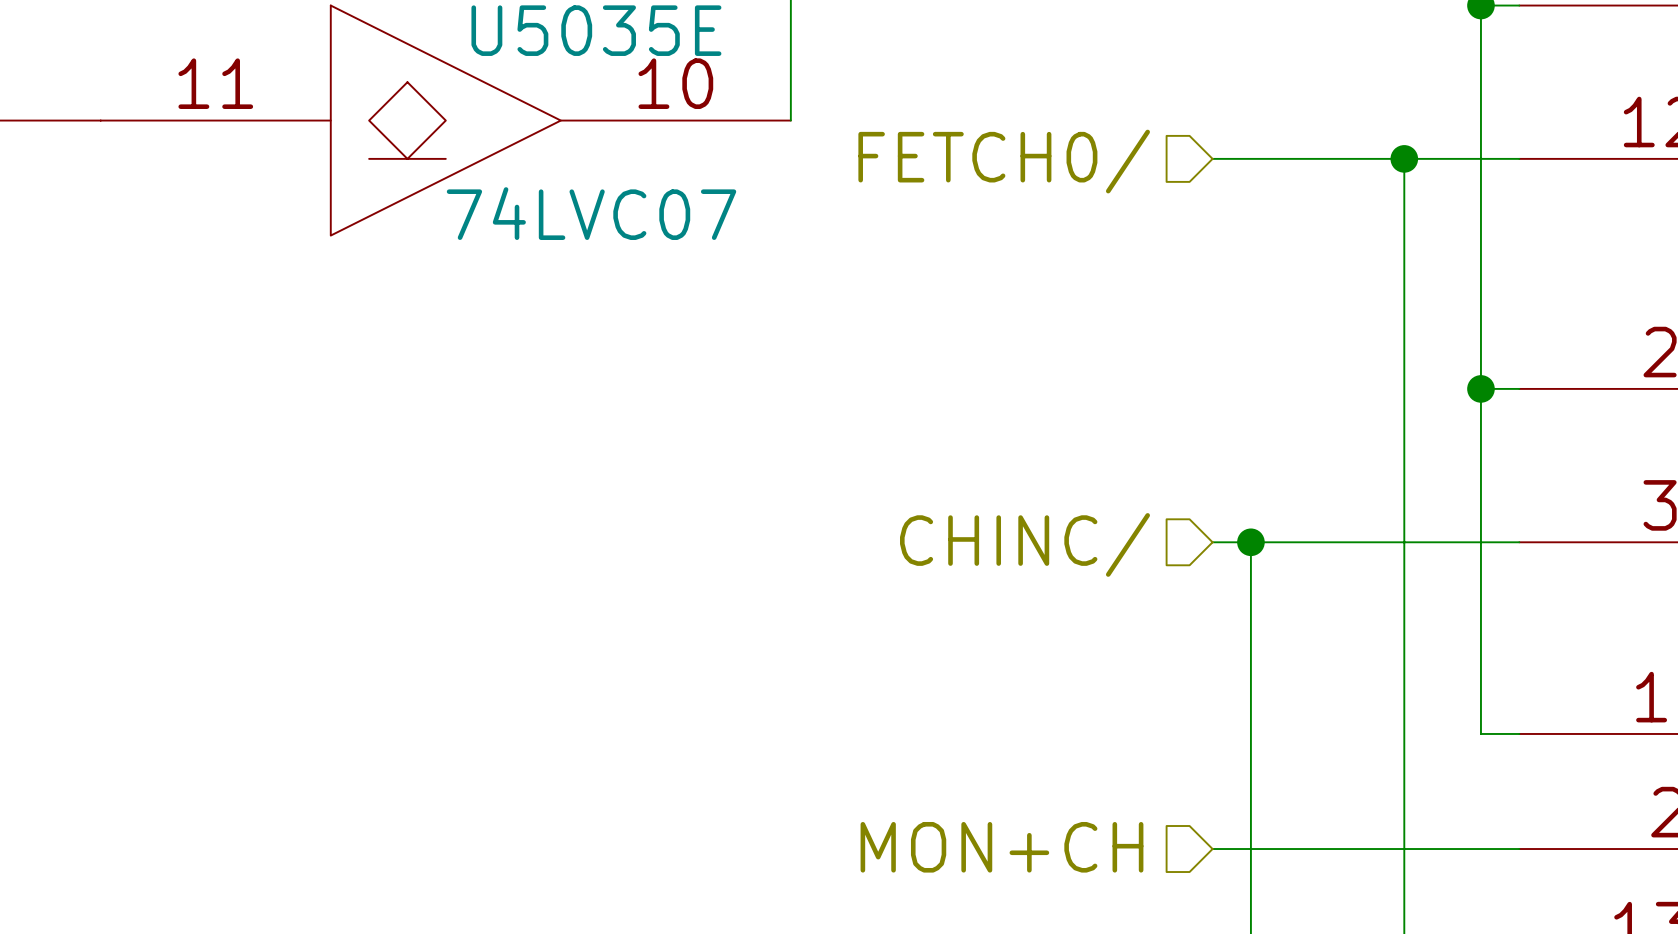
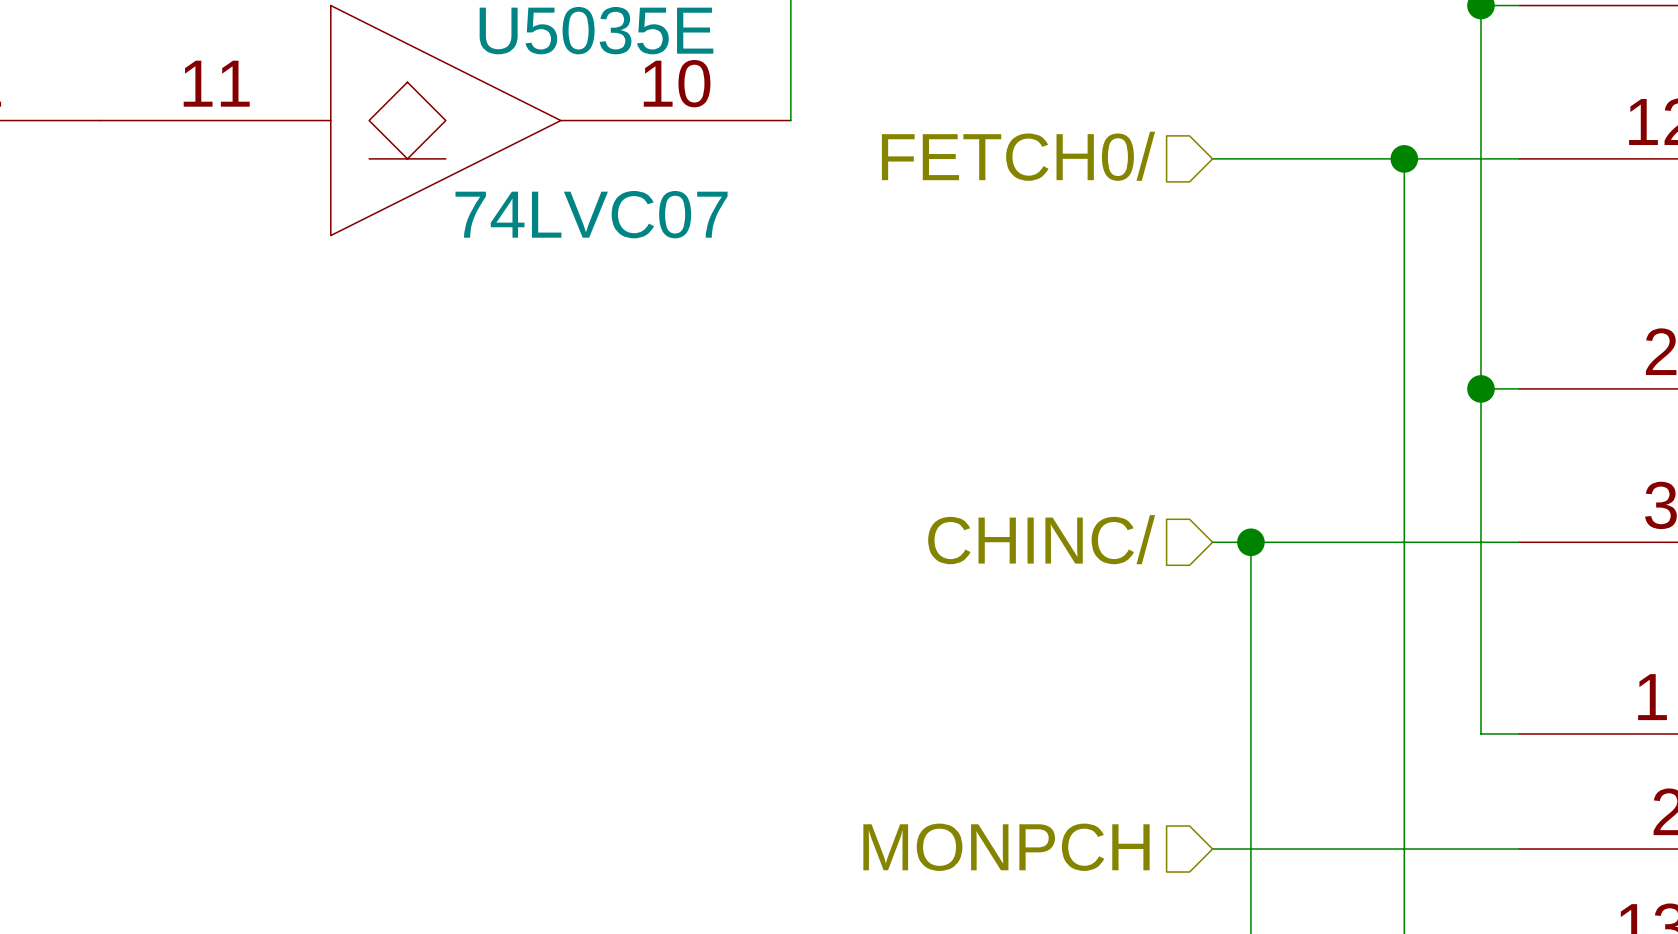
hierarchical label: MON+CH (1001, 847) -> MONPCH (1006, 847)

